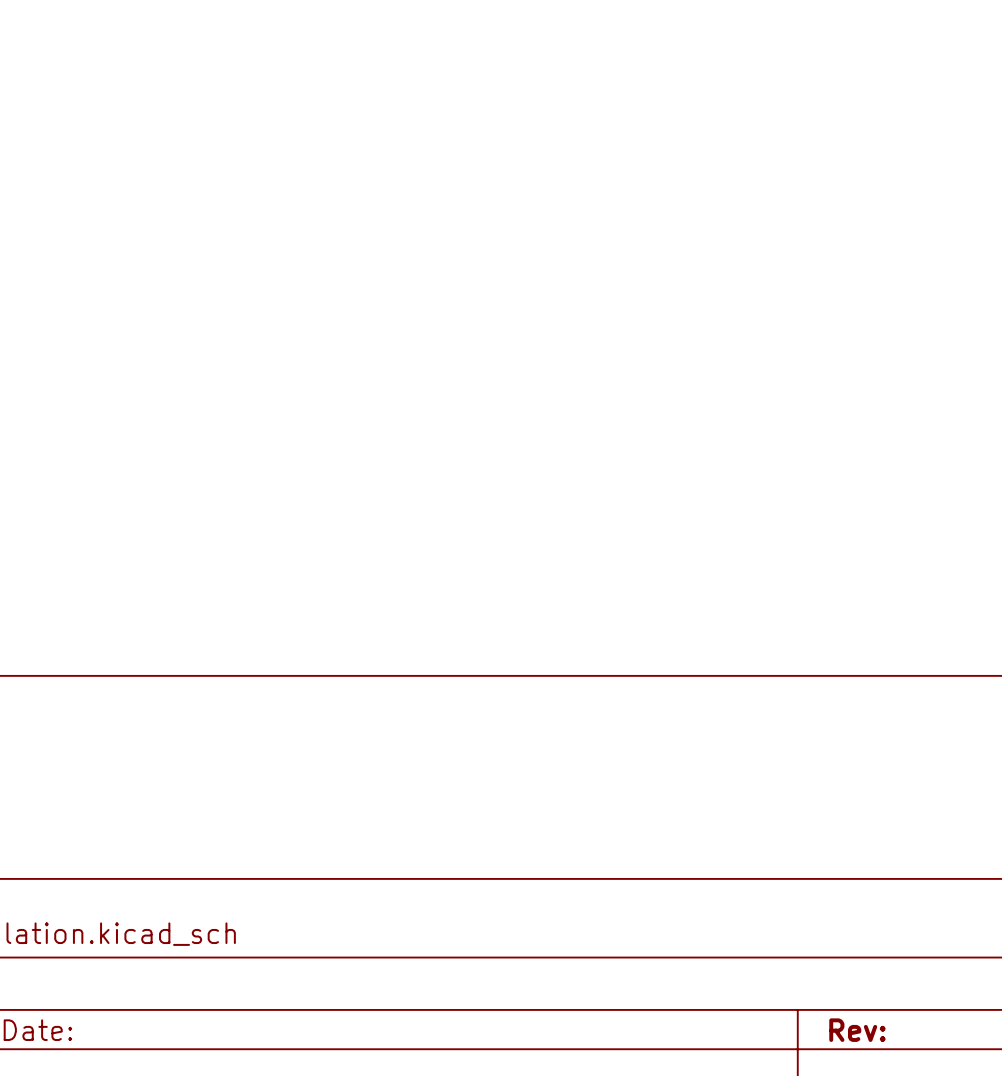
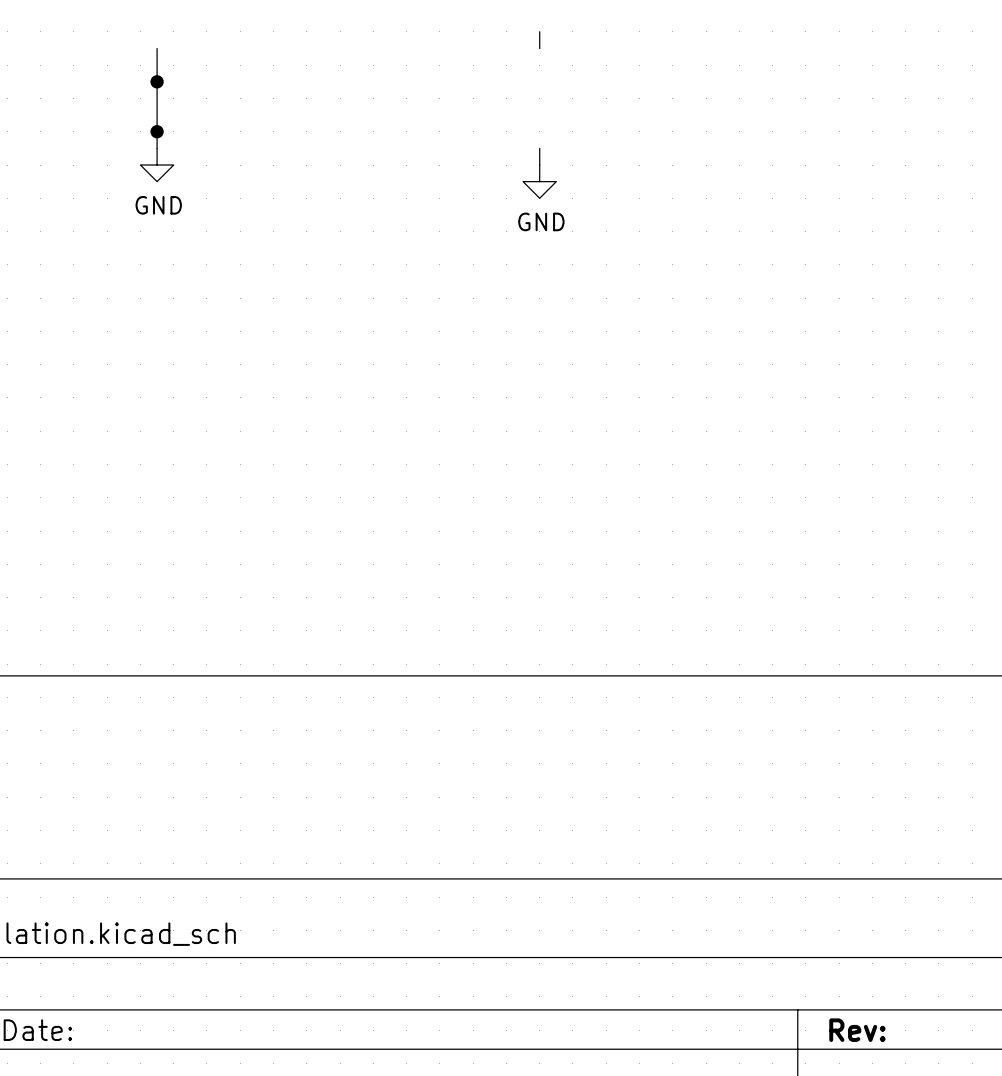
wire: none -> (539, 31) (539, 48)
wire: none -> (157, 48) (157, 148)
junction: none -> (157, 81)
junction: none -> (157, 131)
wire: none -> (539, 148) (539, 165)
power symbol: none -> GND (157, 165)
power symbol: none -> GND (539, 181)

